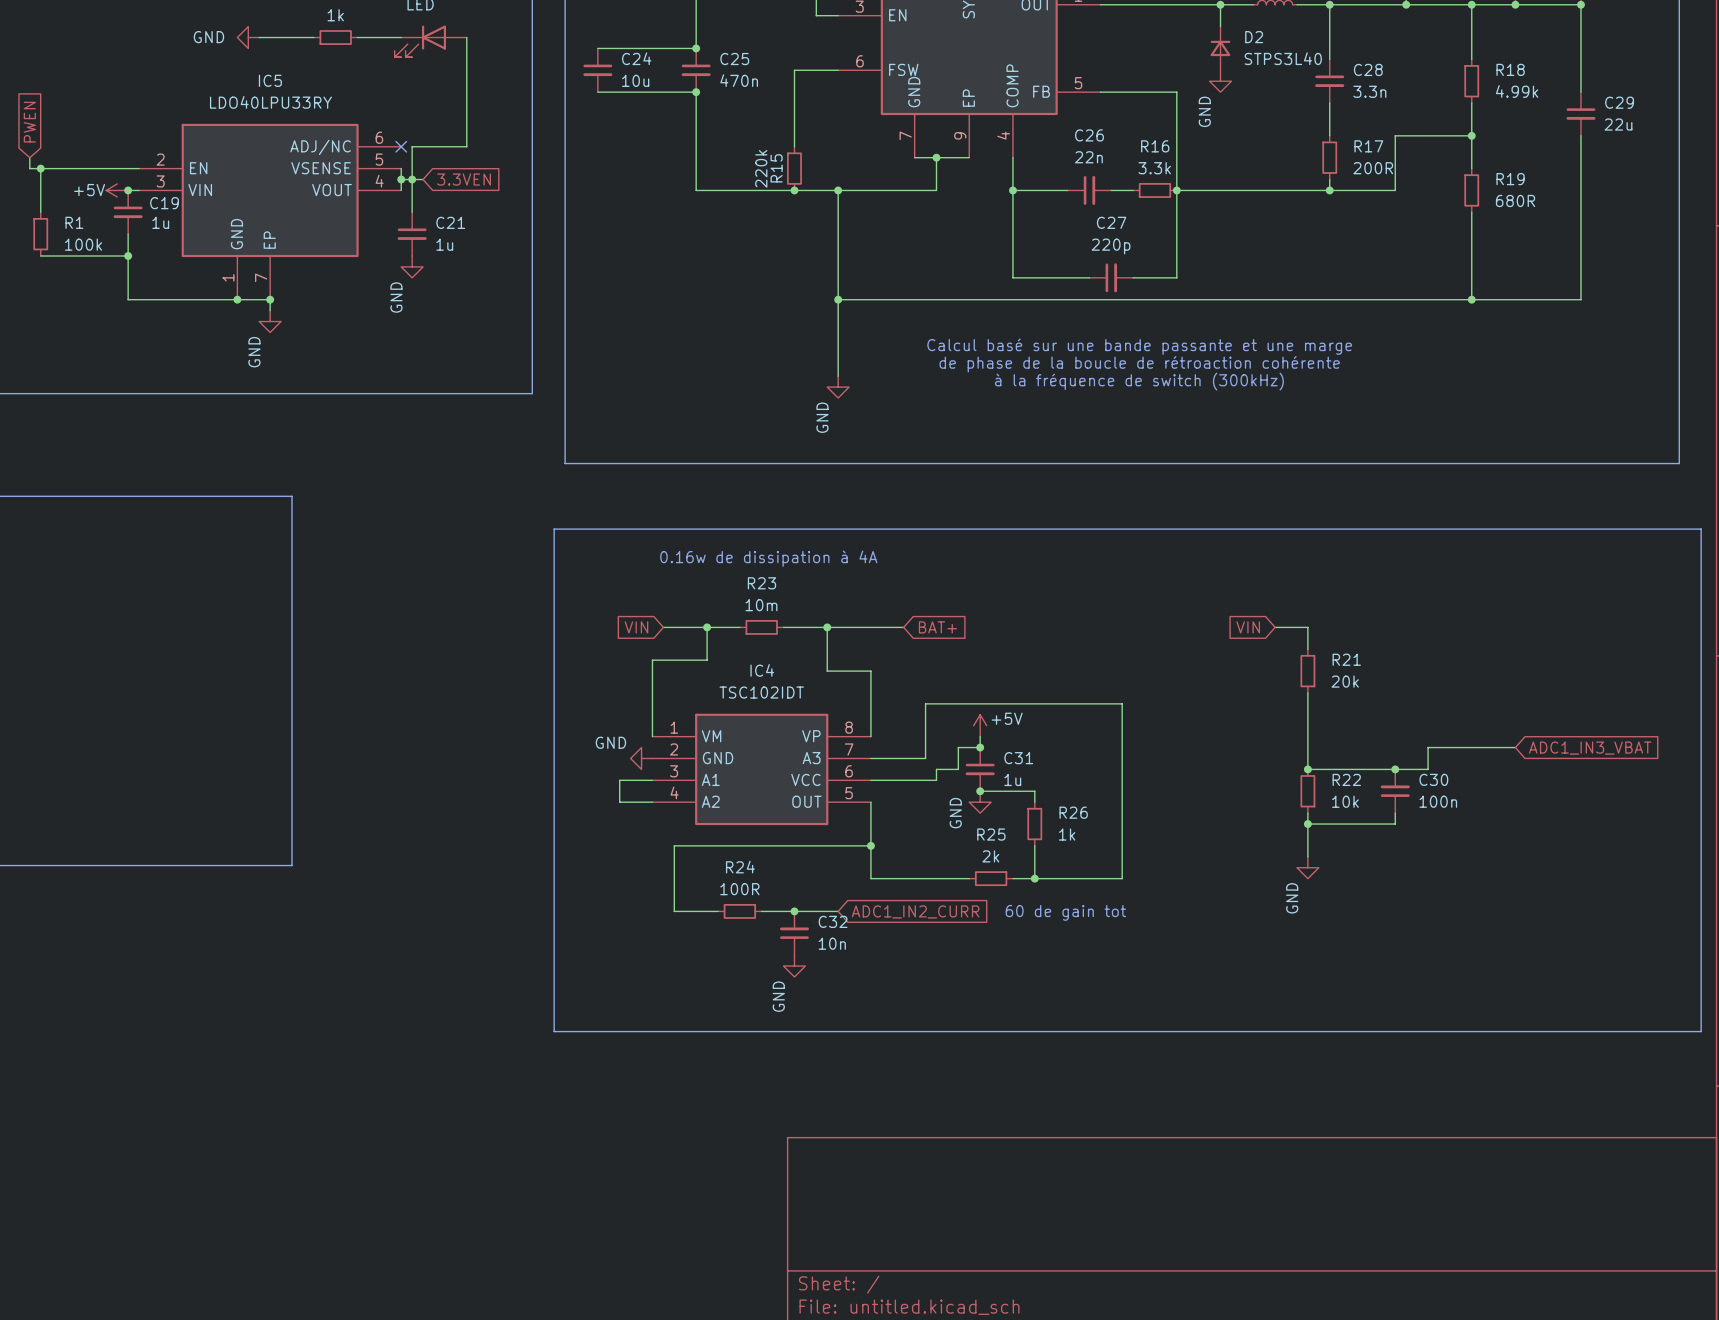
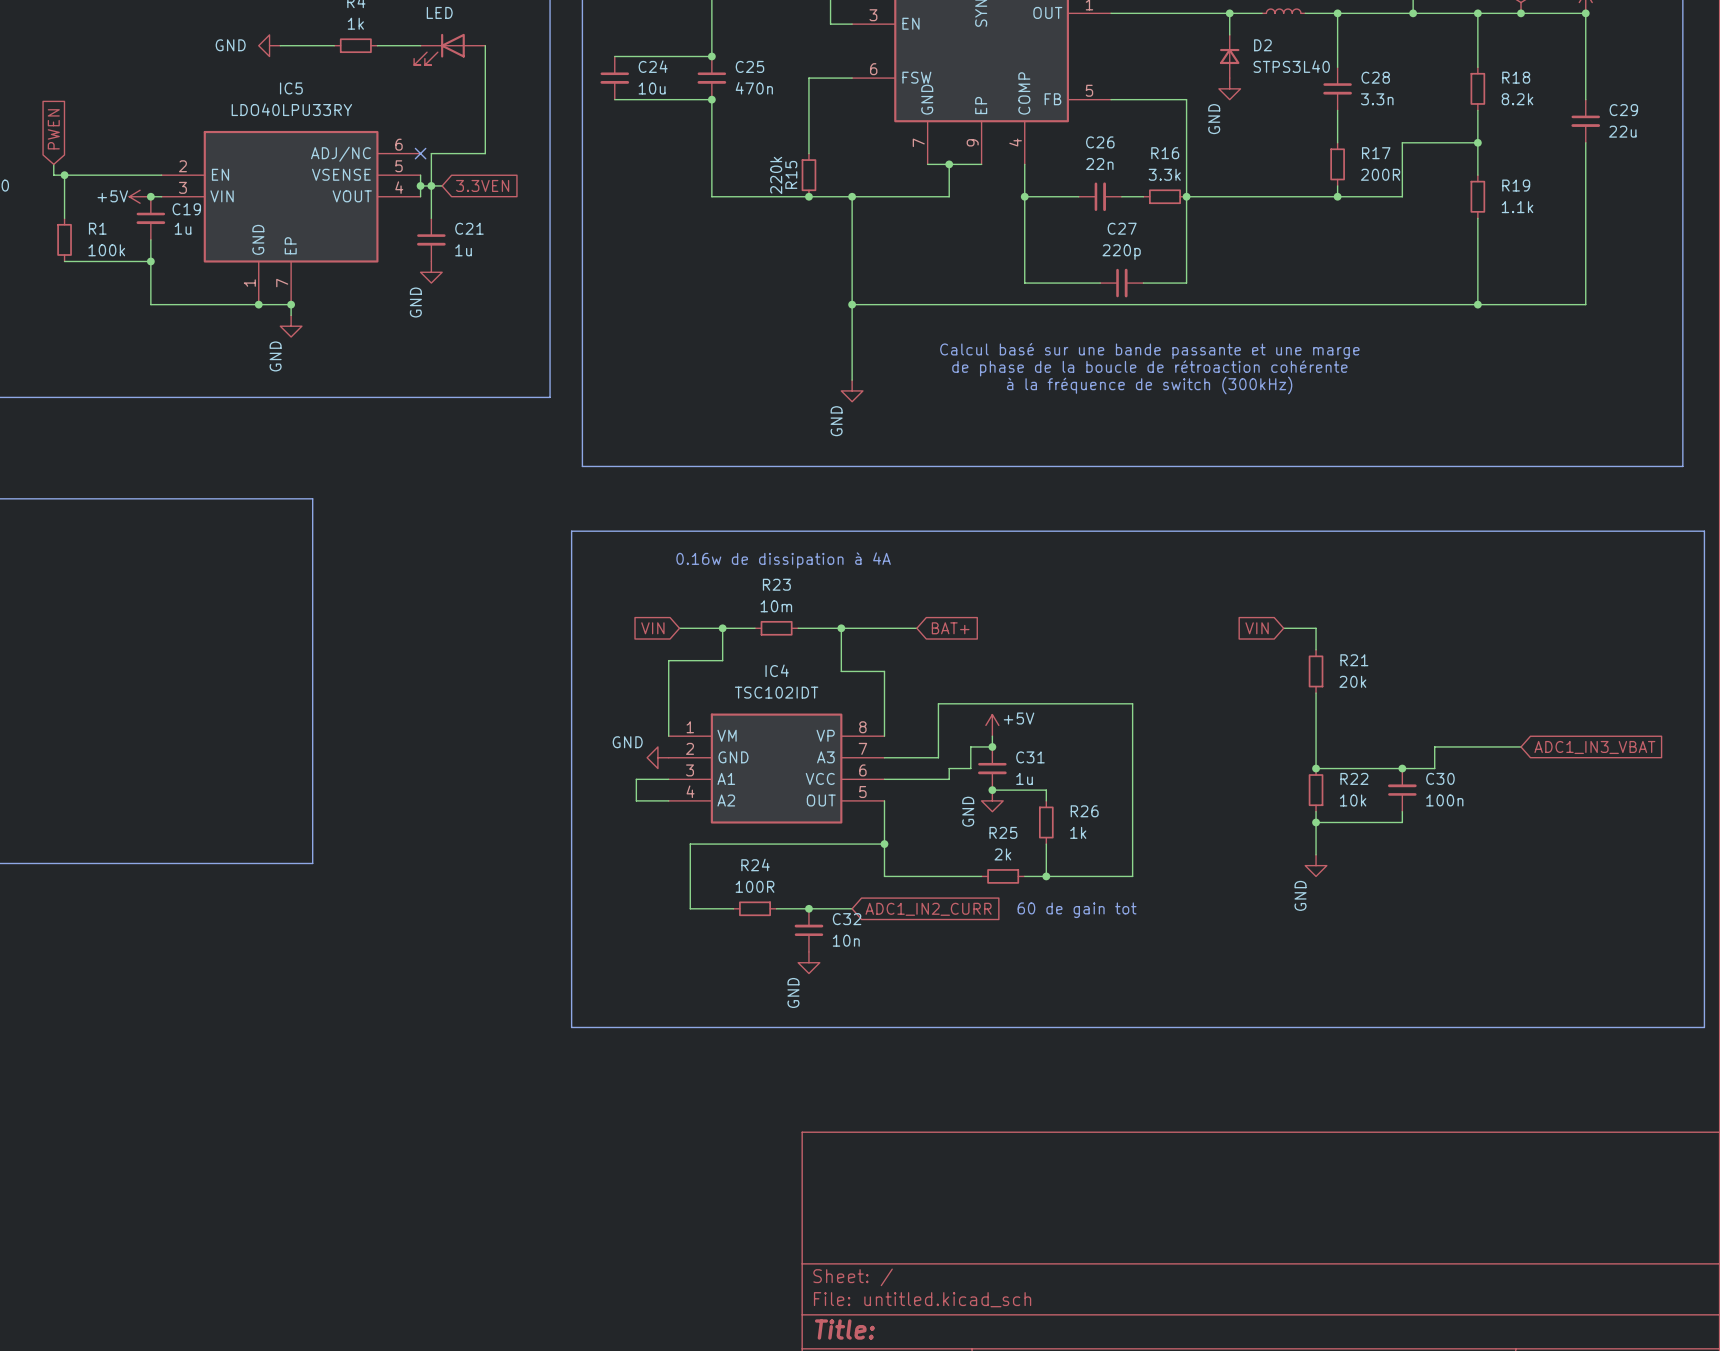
R18 value: 4.99k (1517, 91) -> 8.2k (1517, 99)
R19 value: 680R (1515, 200) -> 1.1k (1517, 207)

